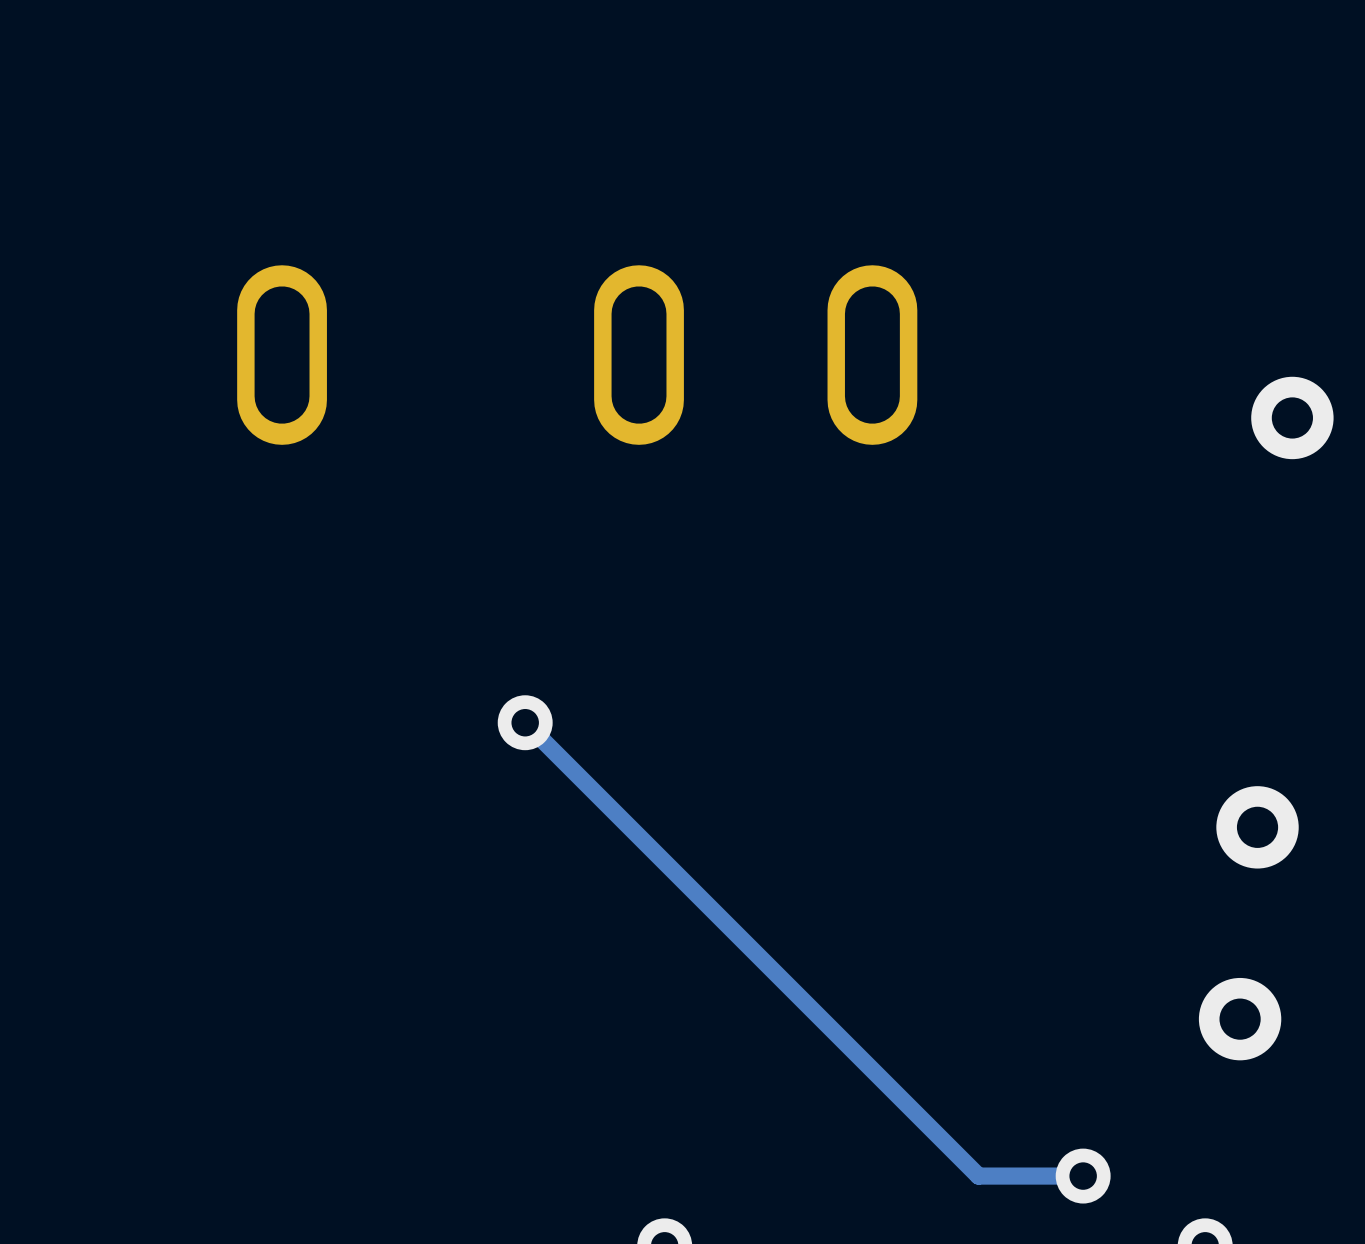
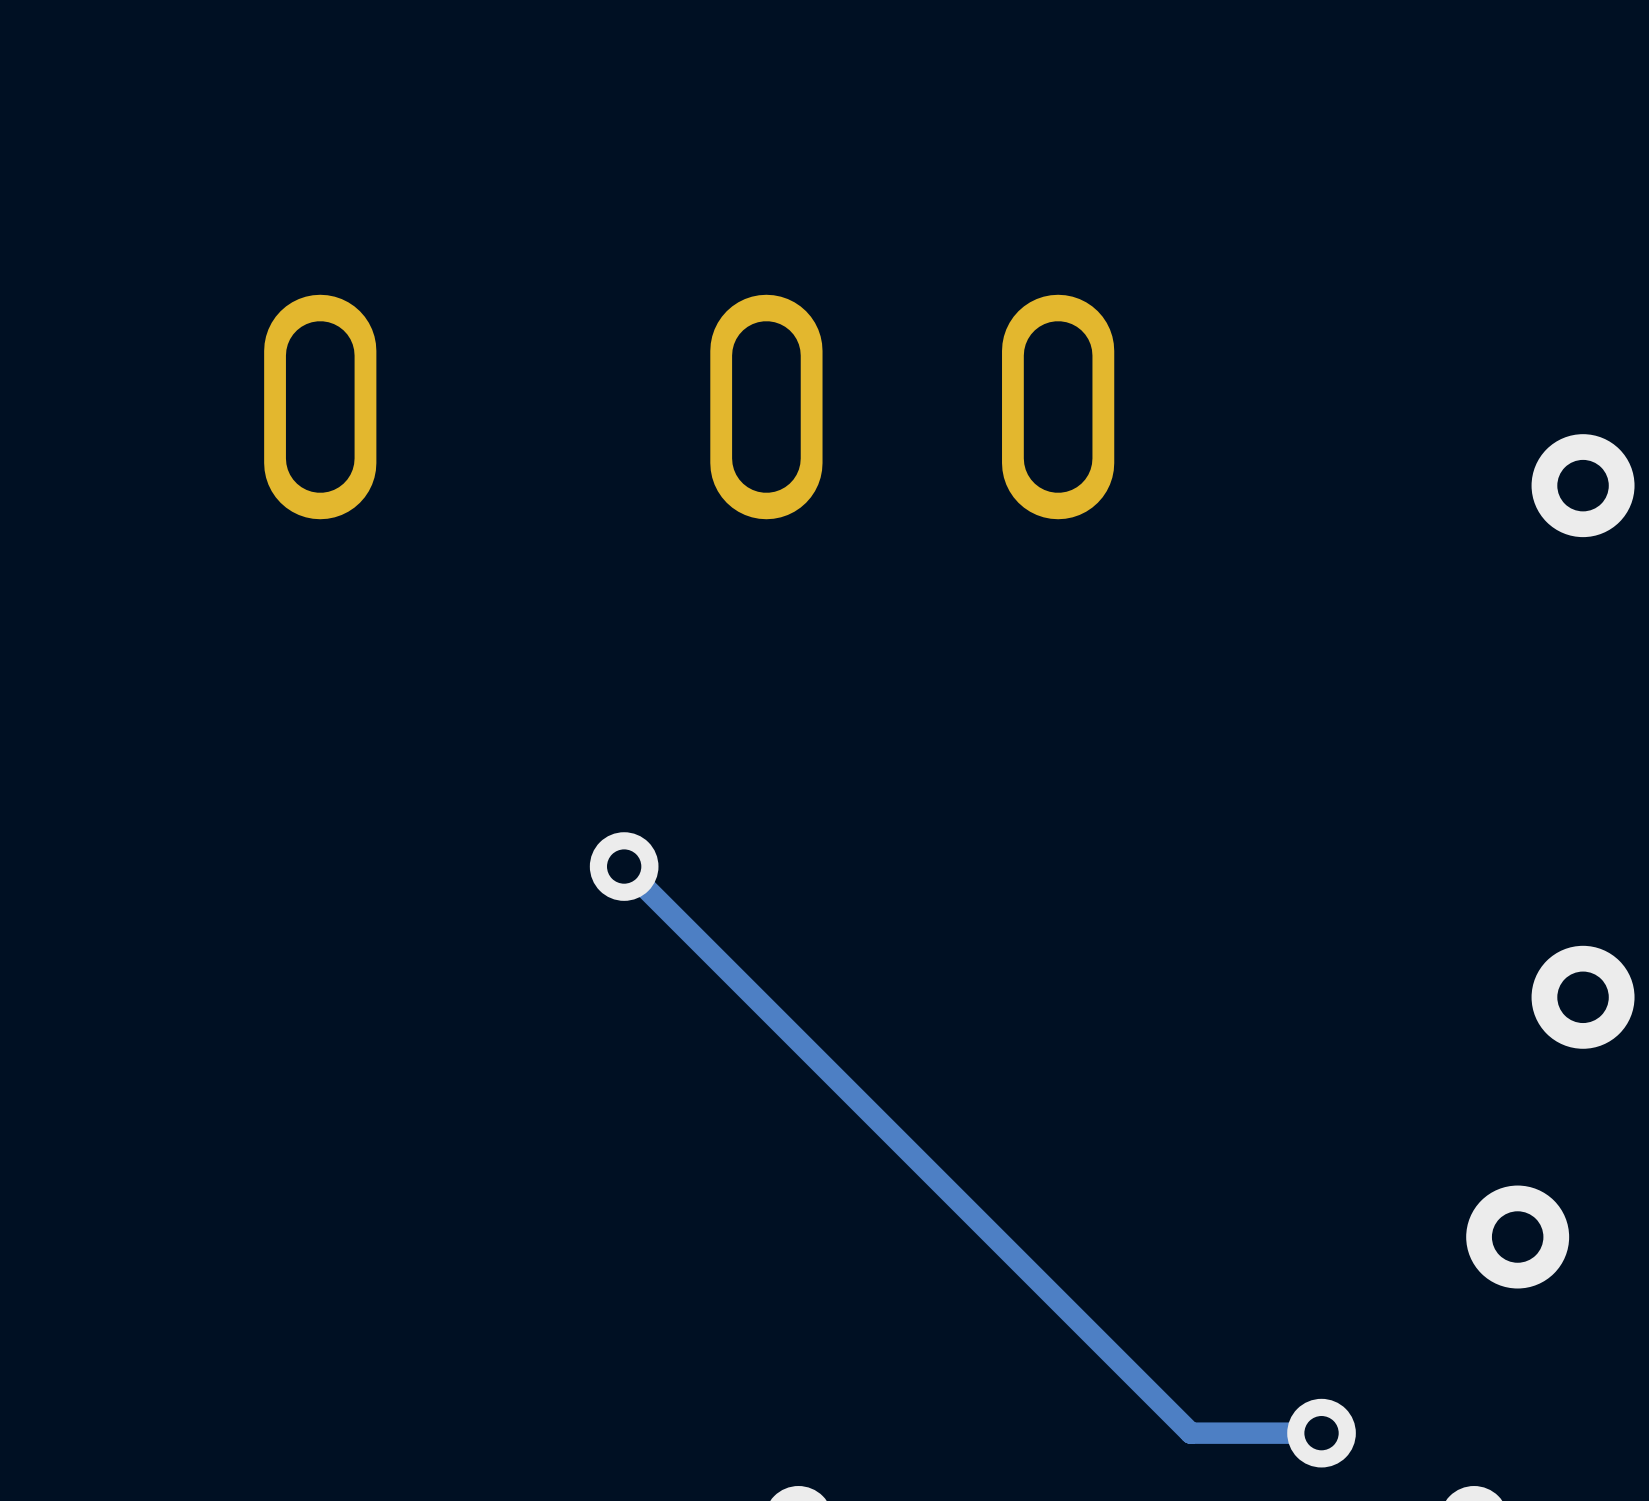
via position: (1257, 827) -> (1583, 997)

